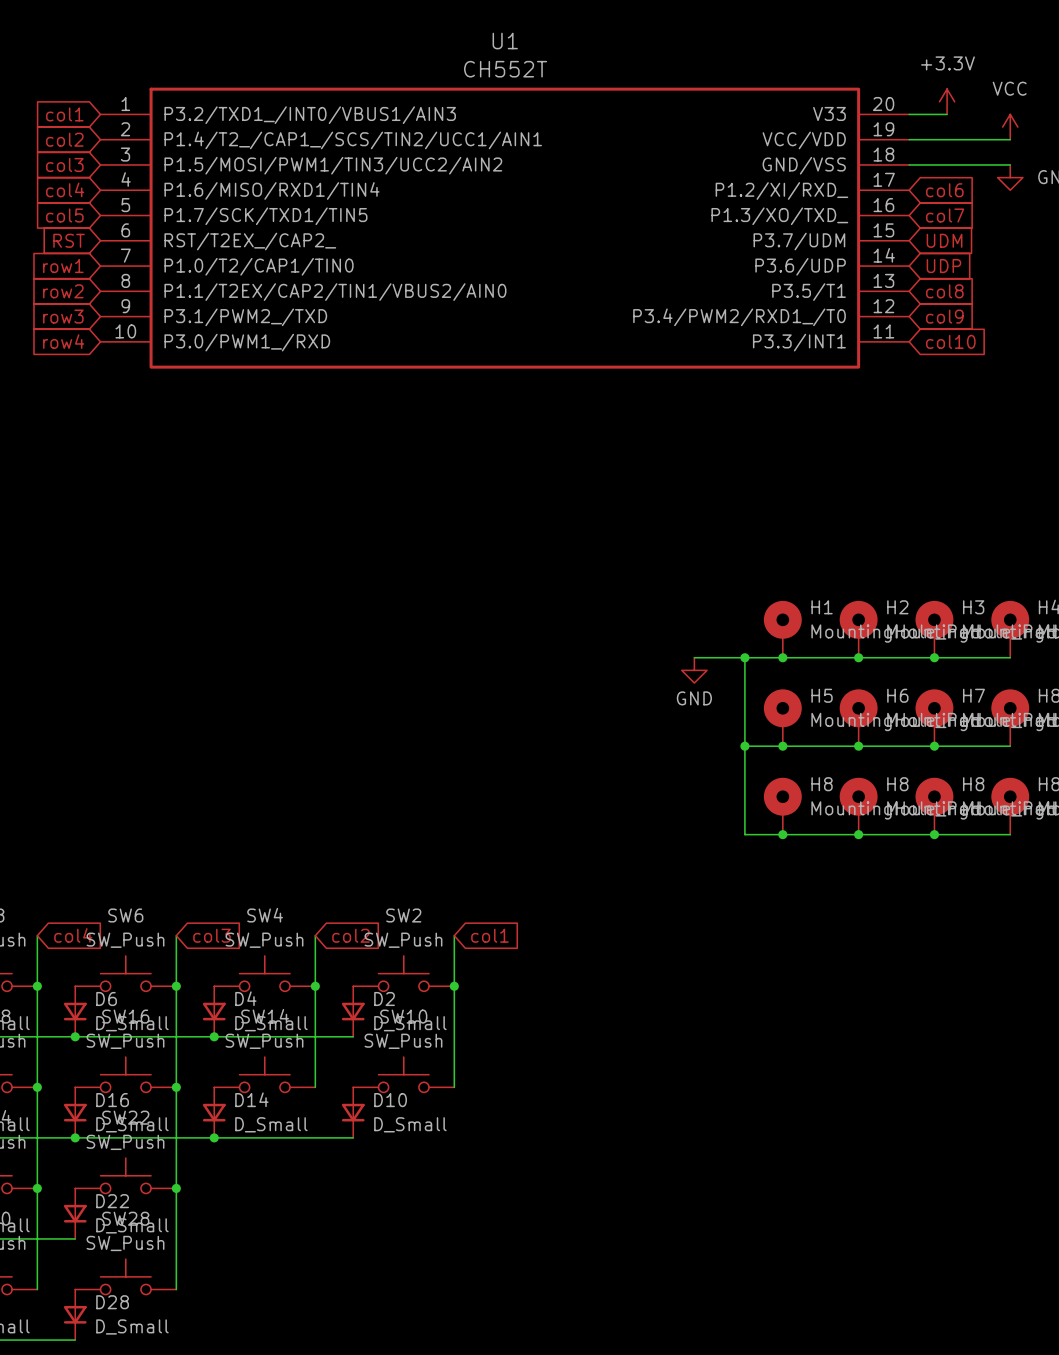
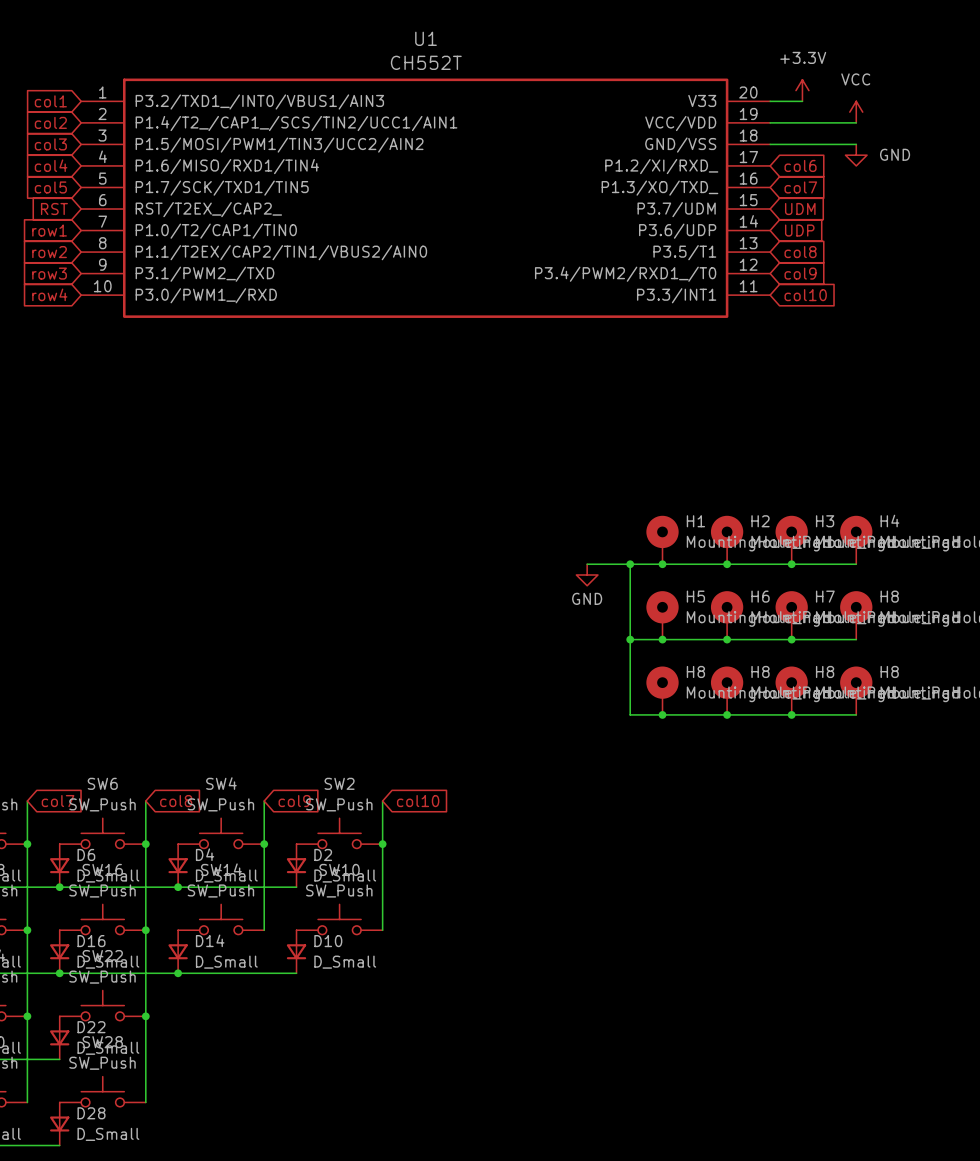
global label: col4 (73, 935) -> col7 (58, 801)
global label: col3 (212, 935) -> col8 (176, 801)
global label: col2 (350, 935) -> col9 (294, 801)
global label: col1 (489, 935) -> col10 (418, 801)

